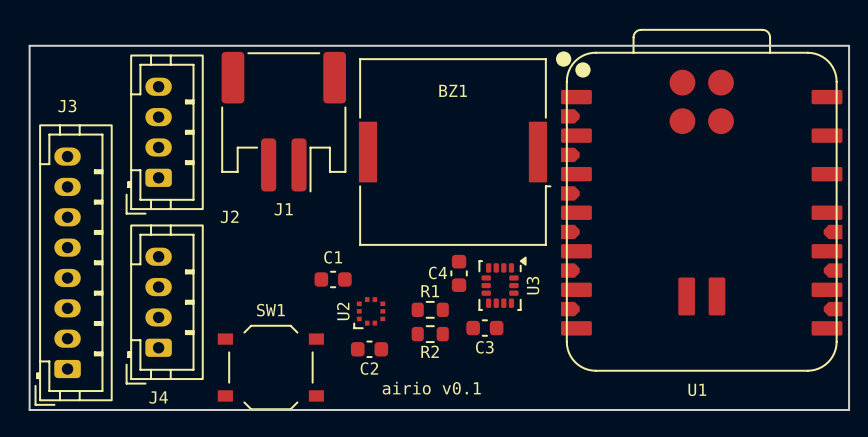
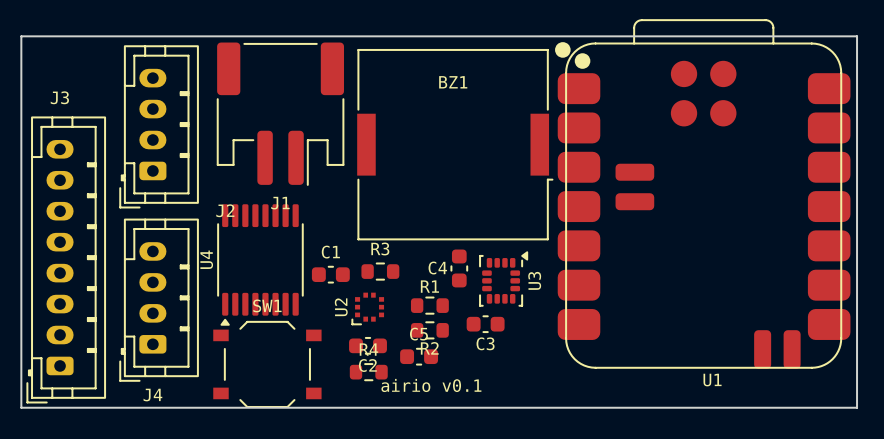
U1 footprint: [555, 28, 843, 372] -> [555, 19, 851, 369]
U4: none -> (260, 264)
R3: none -> (380, 271)
C5: none -> (419, 356)
R4: none -> (368, 372)

